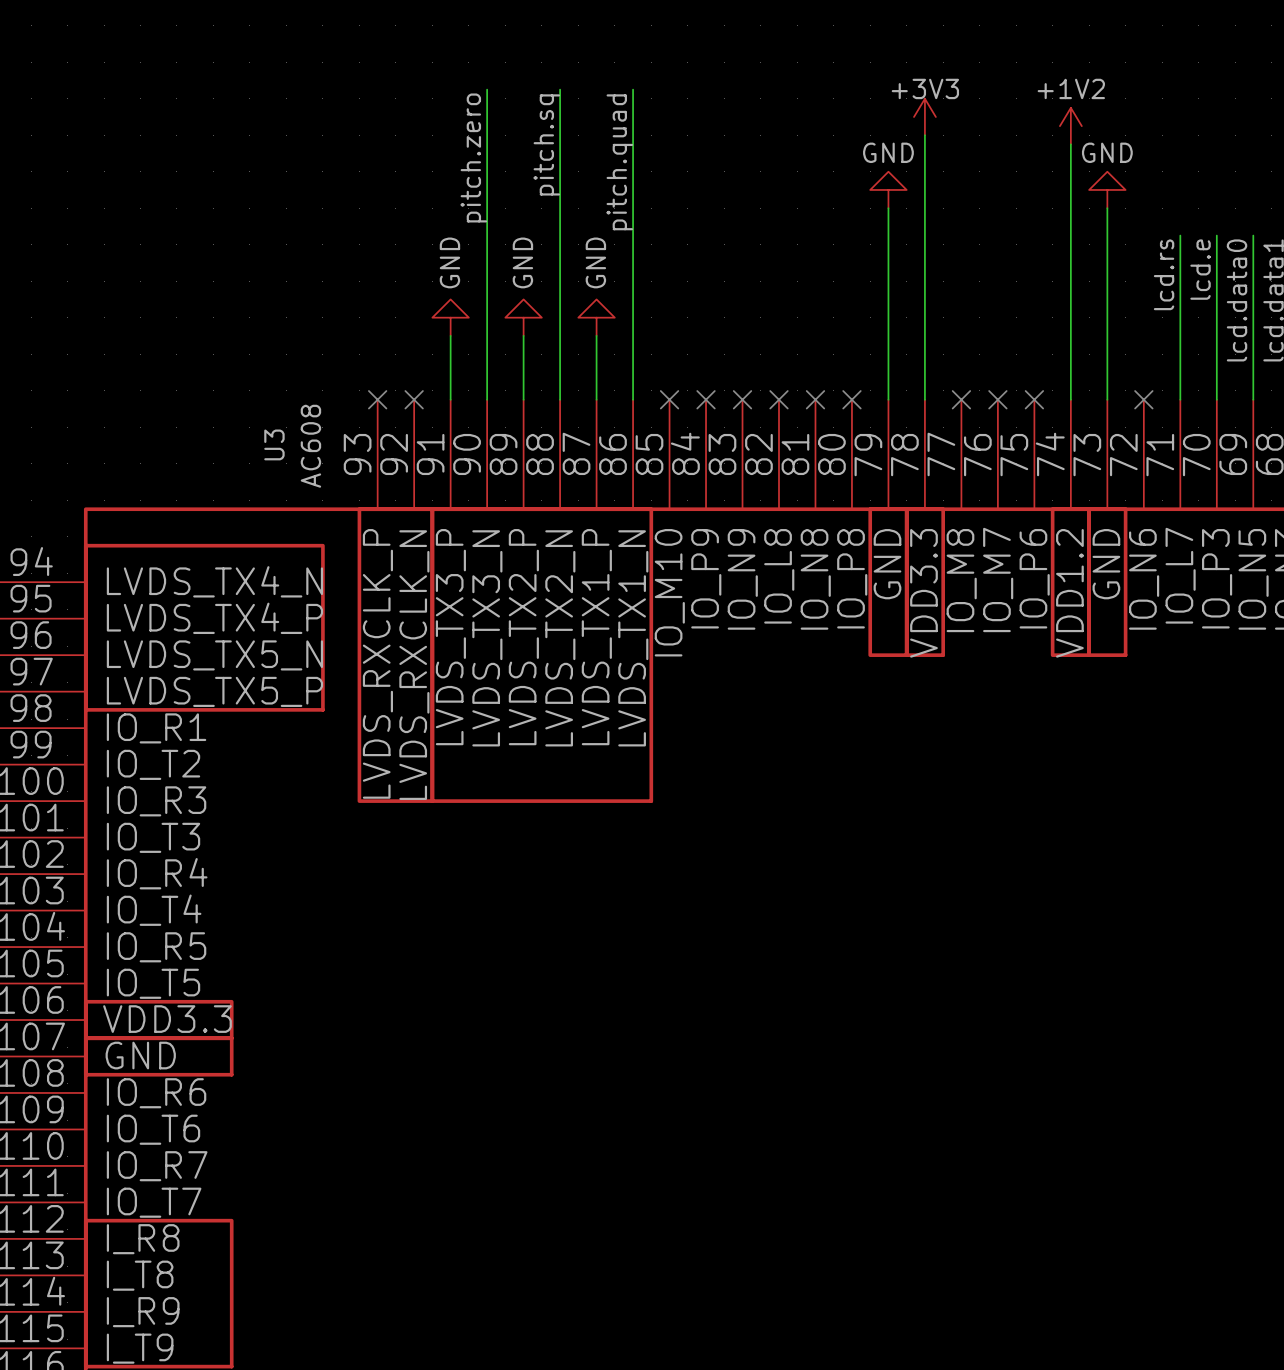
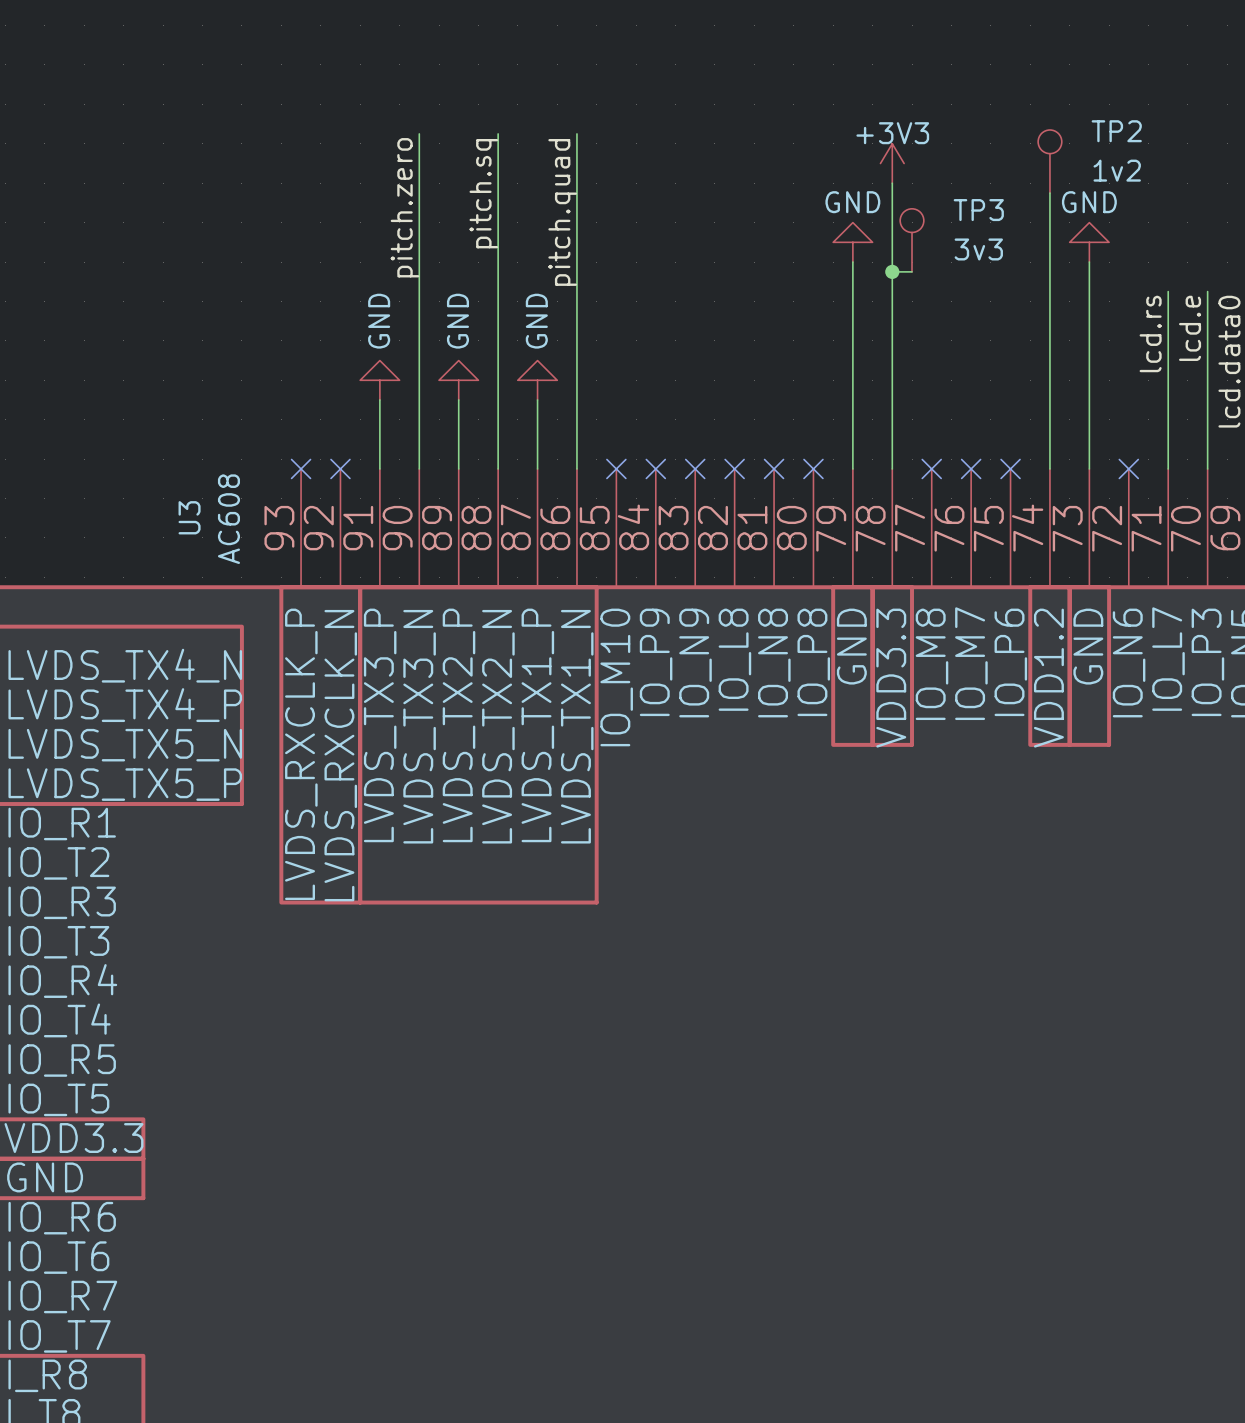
TP2: none -> 1v2 (1049, 161)
power symbol: +1V2 (1070, 126) -> none
TP3: none -> 3v3 (912, 240)
wire: none -> (892, 271) (912, 271)
junction: none -> (892, 271)

